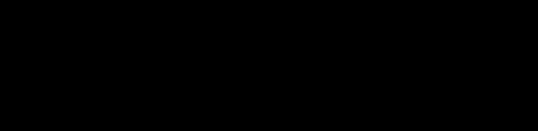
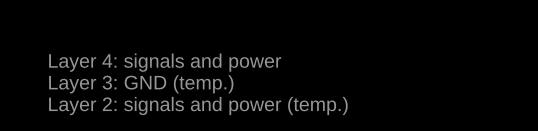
text: none -> Layer 4: signals and power (165, 62)
text: none -> Layer 3: GND (temp.) (141, 84)
text: none -> Layer 2: signals and power (temp.) (198, 105)

